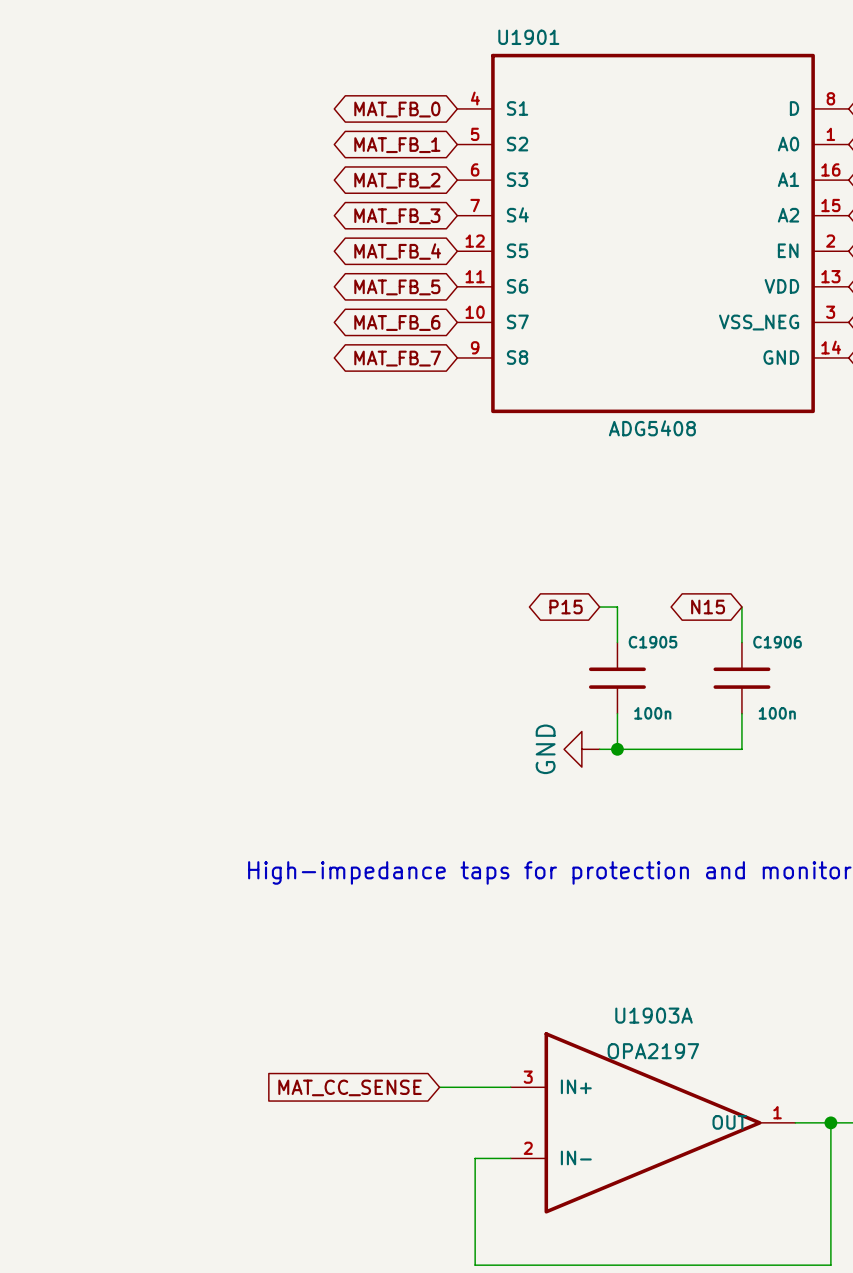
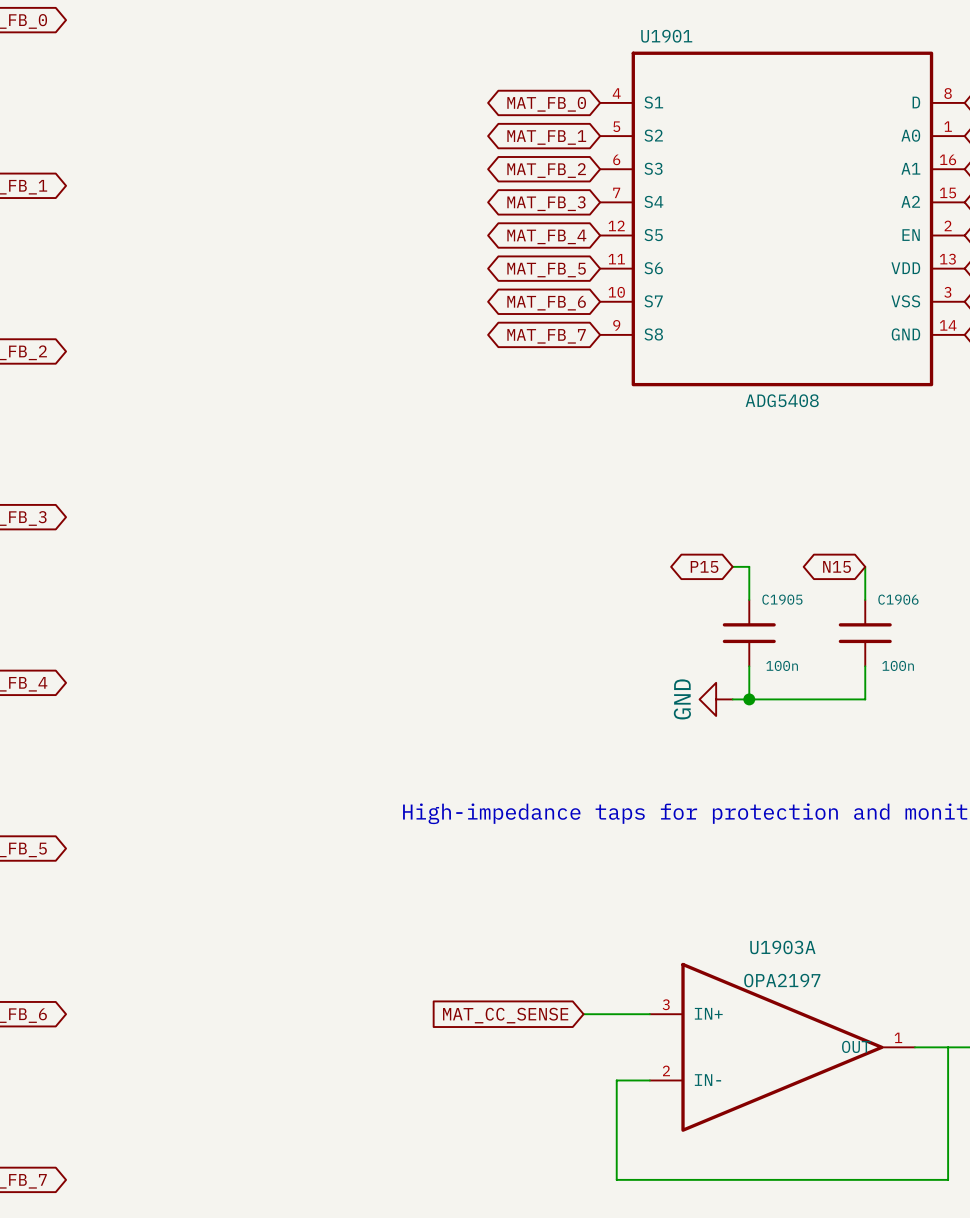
U1901 pin name: VSS_NEG (759, 322) -> VSS (905, 301)
junction: (830, 1122) -> none

